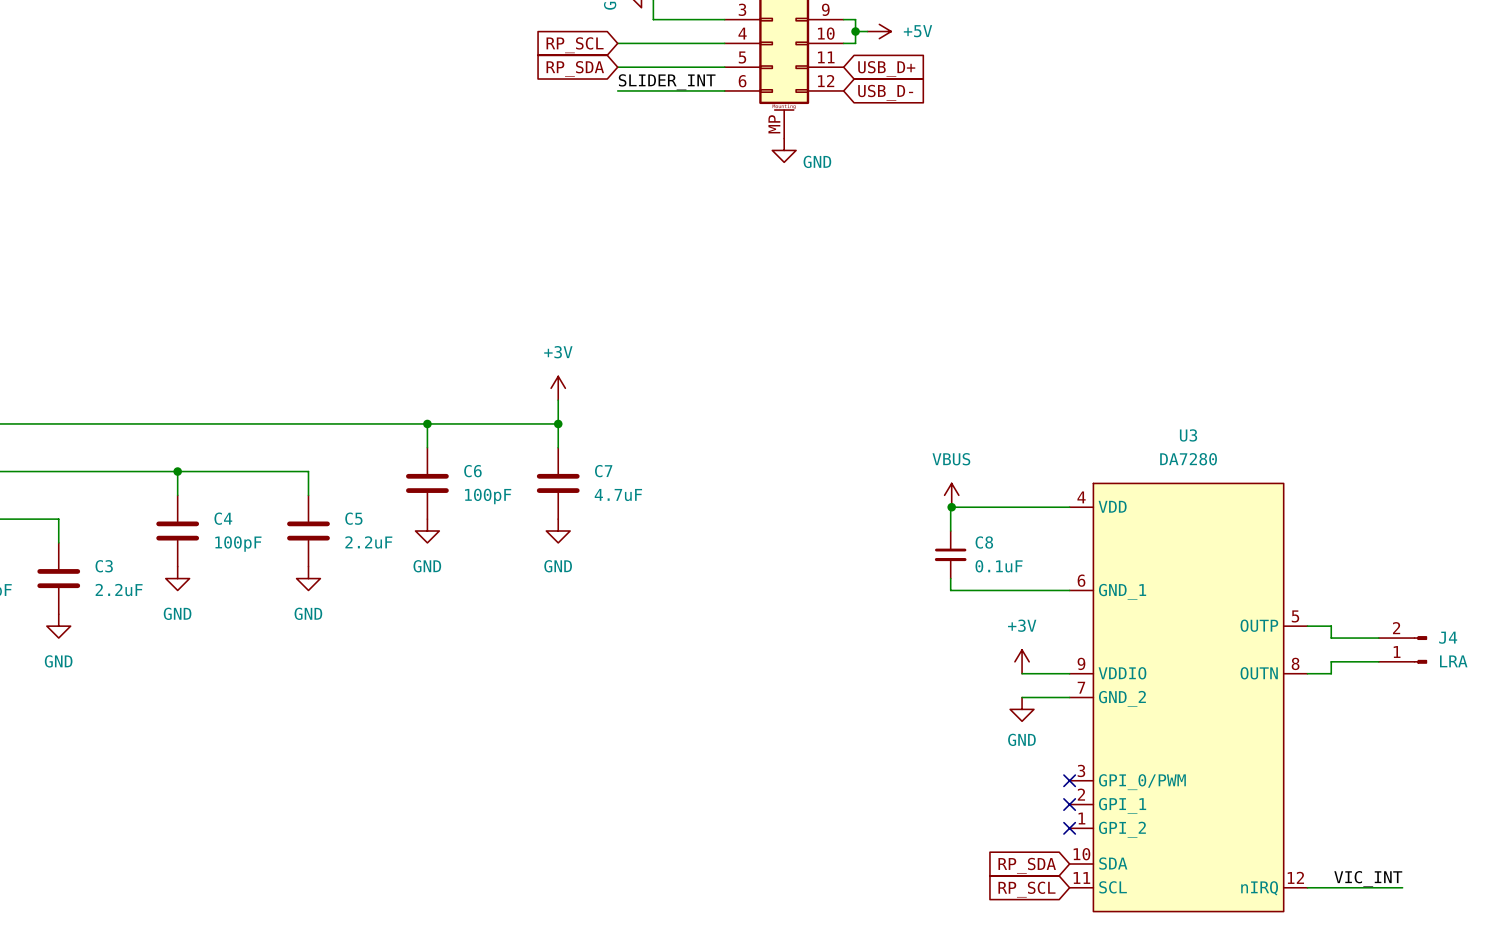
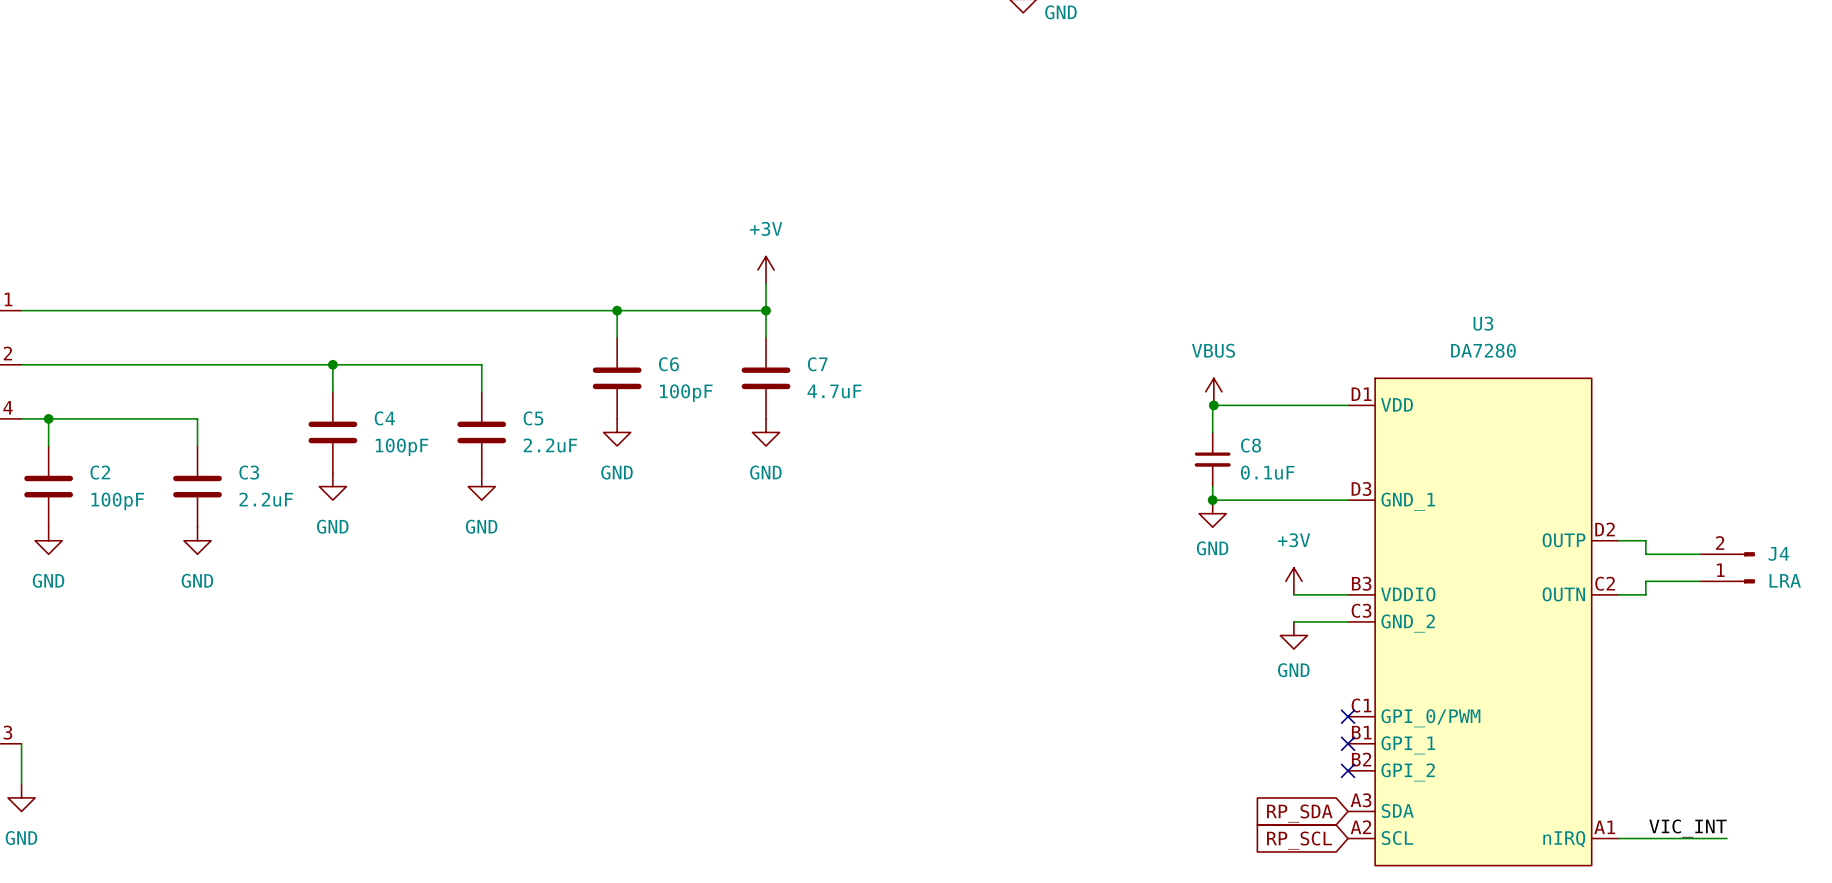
U3 symbol: [1069, 483, 1308, 912] -> [1348, 378, 1619, 866]
junction: none -> (1212, 500)
power symbol: none -> GND (1212, 513)

